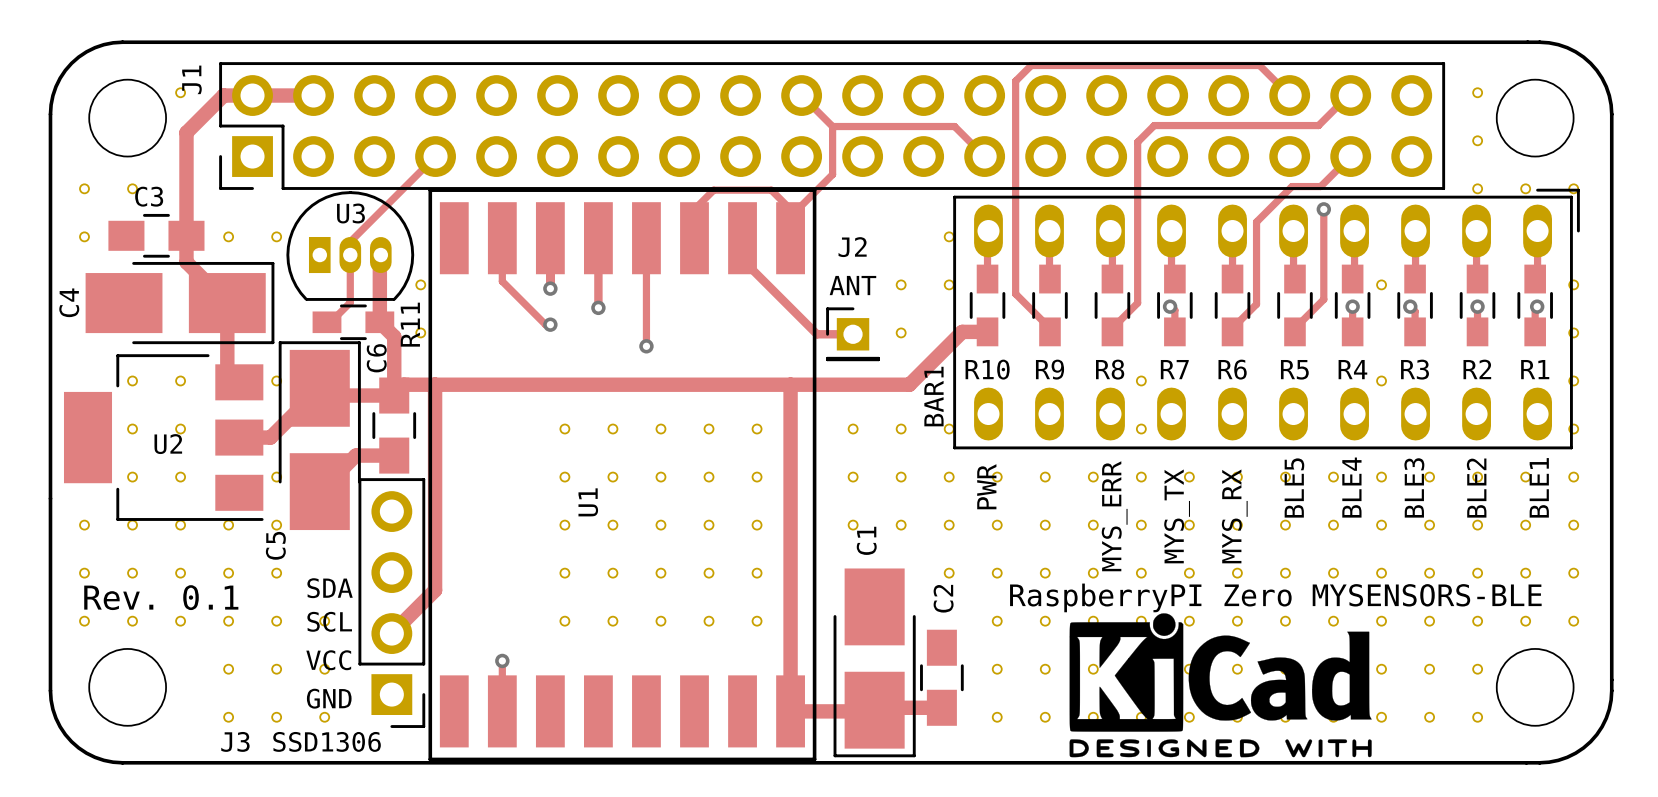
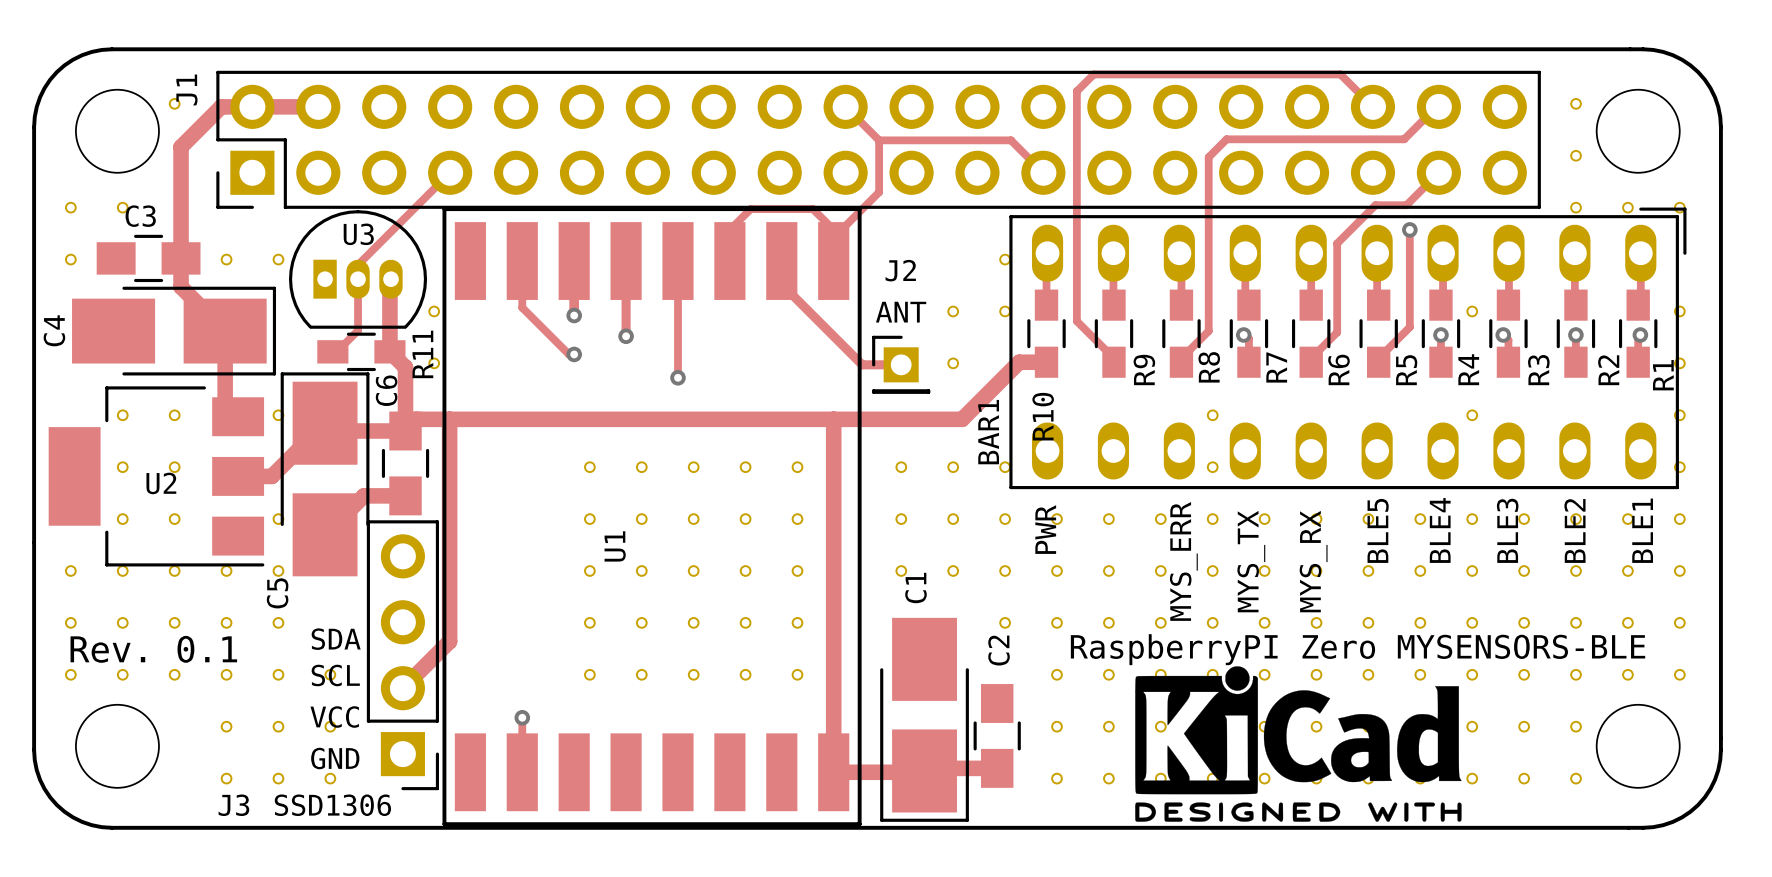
R10 name rotation: 0° (987, 369) -> 90° counterclockwise (1043, 416)
R9 name rotation: 0° (1050, 369) -> 90° counterclockwise (1144, 369)
R8 name rotation: 0° (1110, 369) -> 90° counterclockwise (1209, 367)
R7 name rotation: 0° (1174, 369) -> 90° counterclockwise (1276, 367)
R6 name rotation: 0° (1232, 369) -> 90° counterclockwise (1339, 369)
R5 name rotation: 0° (1294, 369) -> 90° counterclockwise (1406, 370)
R4 name rotation: 0° (1352, 369) -> 90° counterclockwise (1468, 369)
R3 name rotation: 0° (1415, 369) -> 90° counterclockwise (1538, 370)
R2 name rotation: 0° (1477, 369) -> 90° counterclockwise (1608, 370)
R1 name rotation: 0° (1535, 369) -> 90° counterclockwise (1663, 375)

